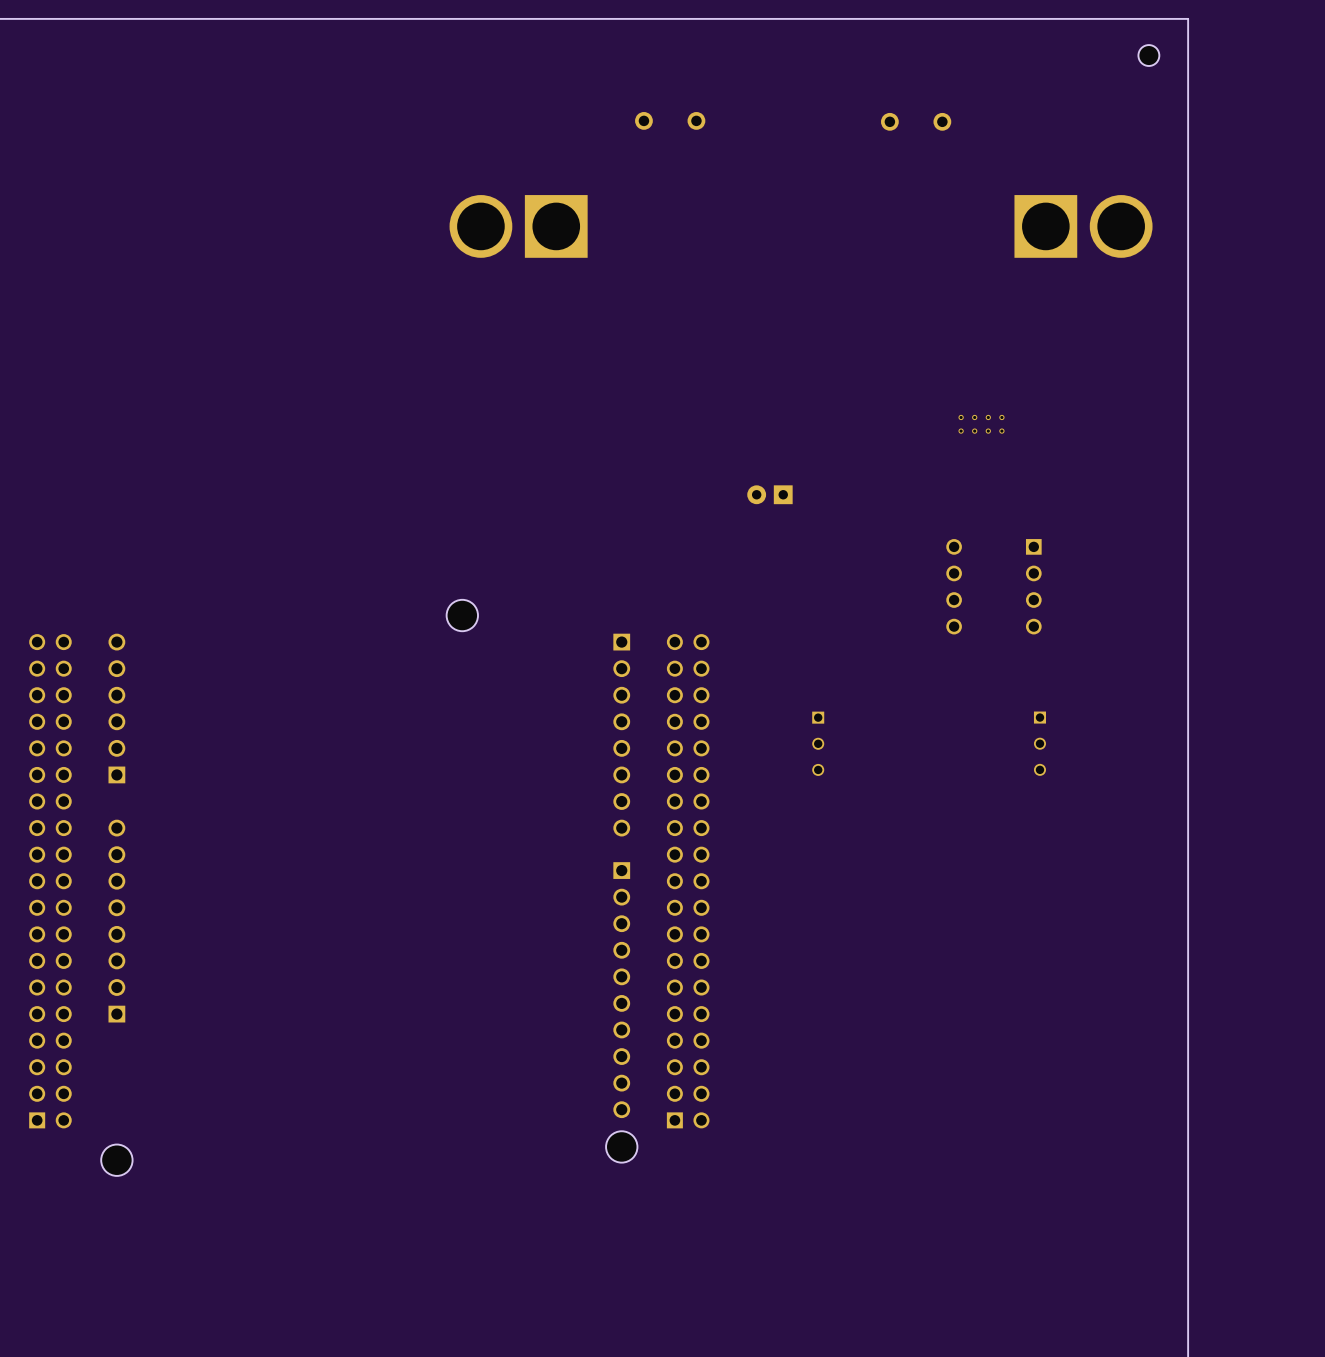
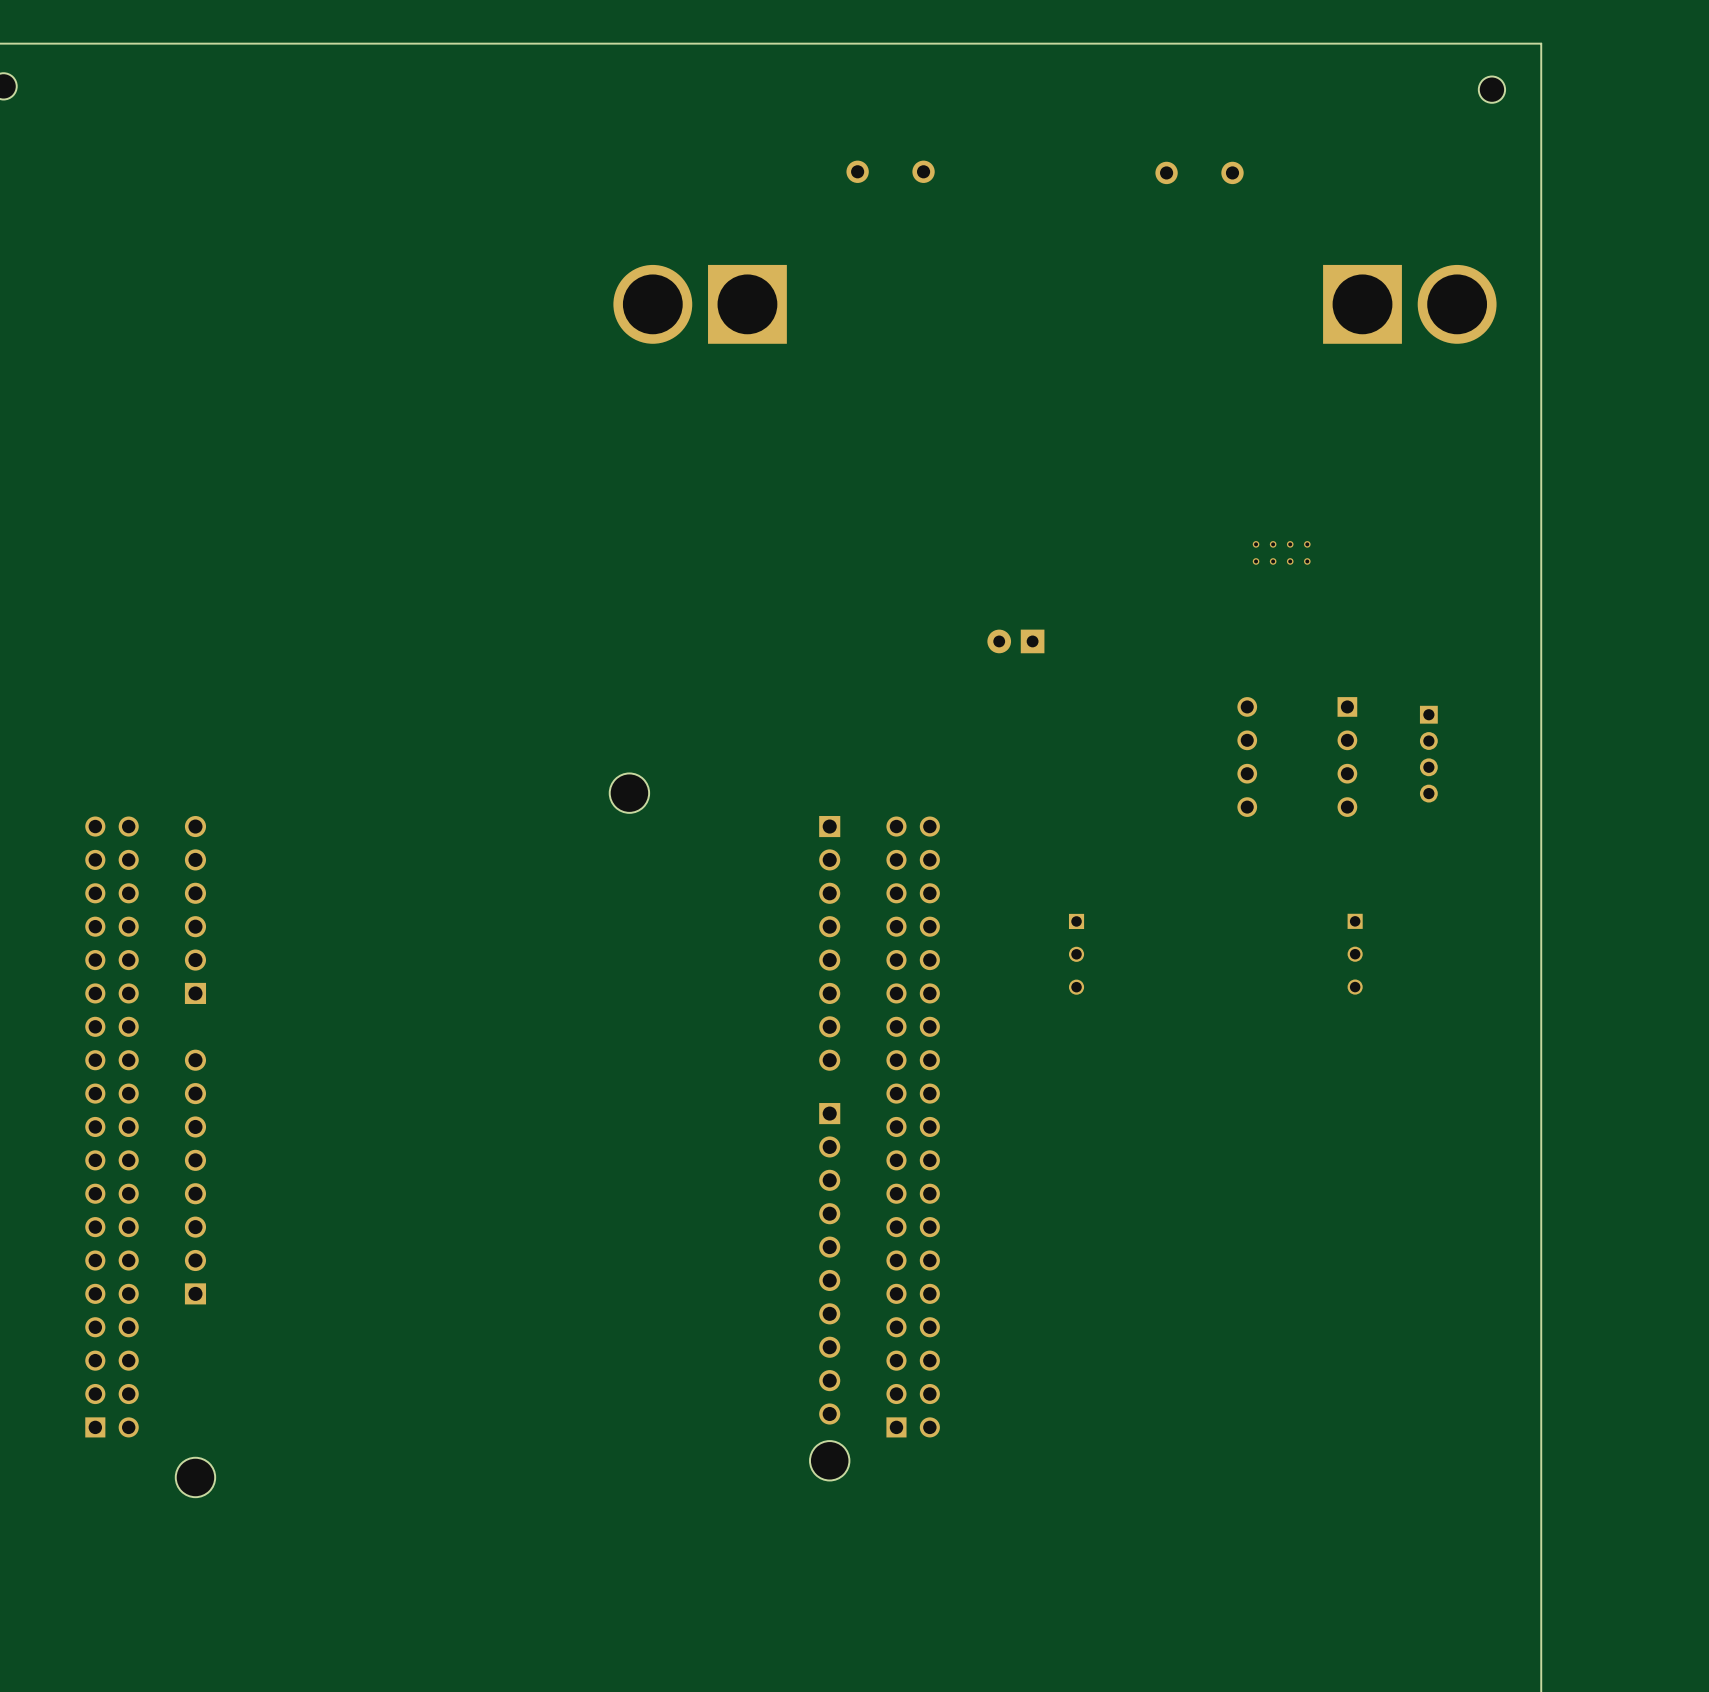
part: none -> (1428, 754)

